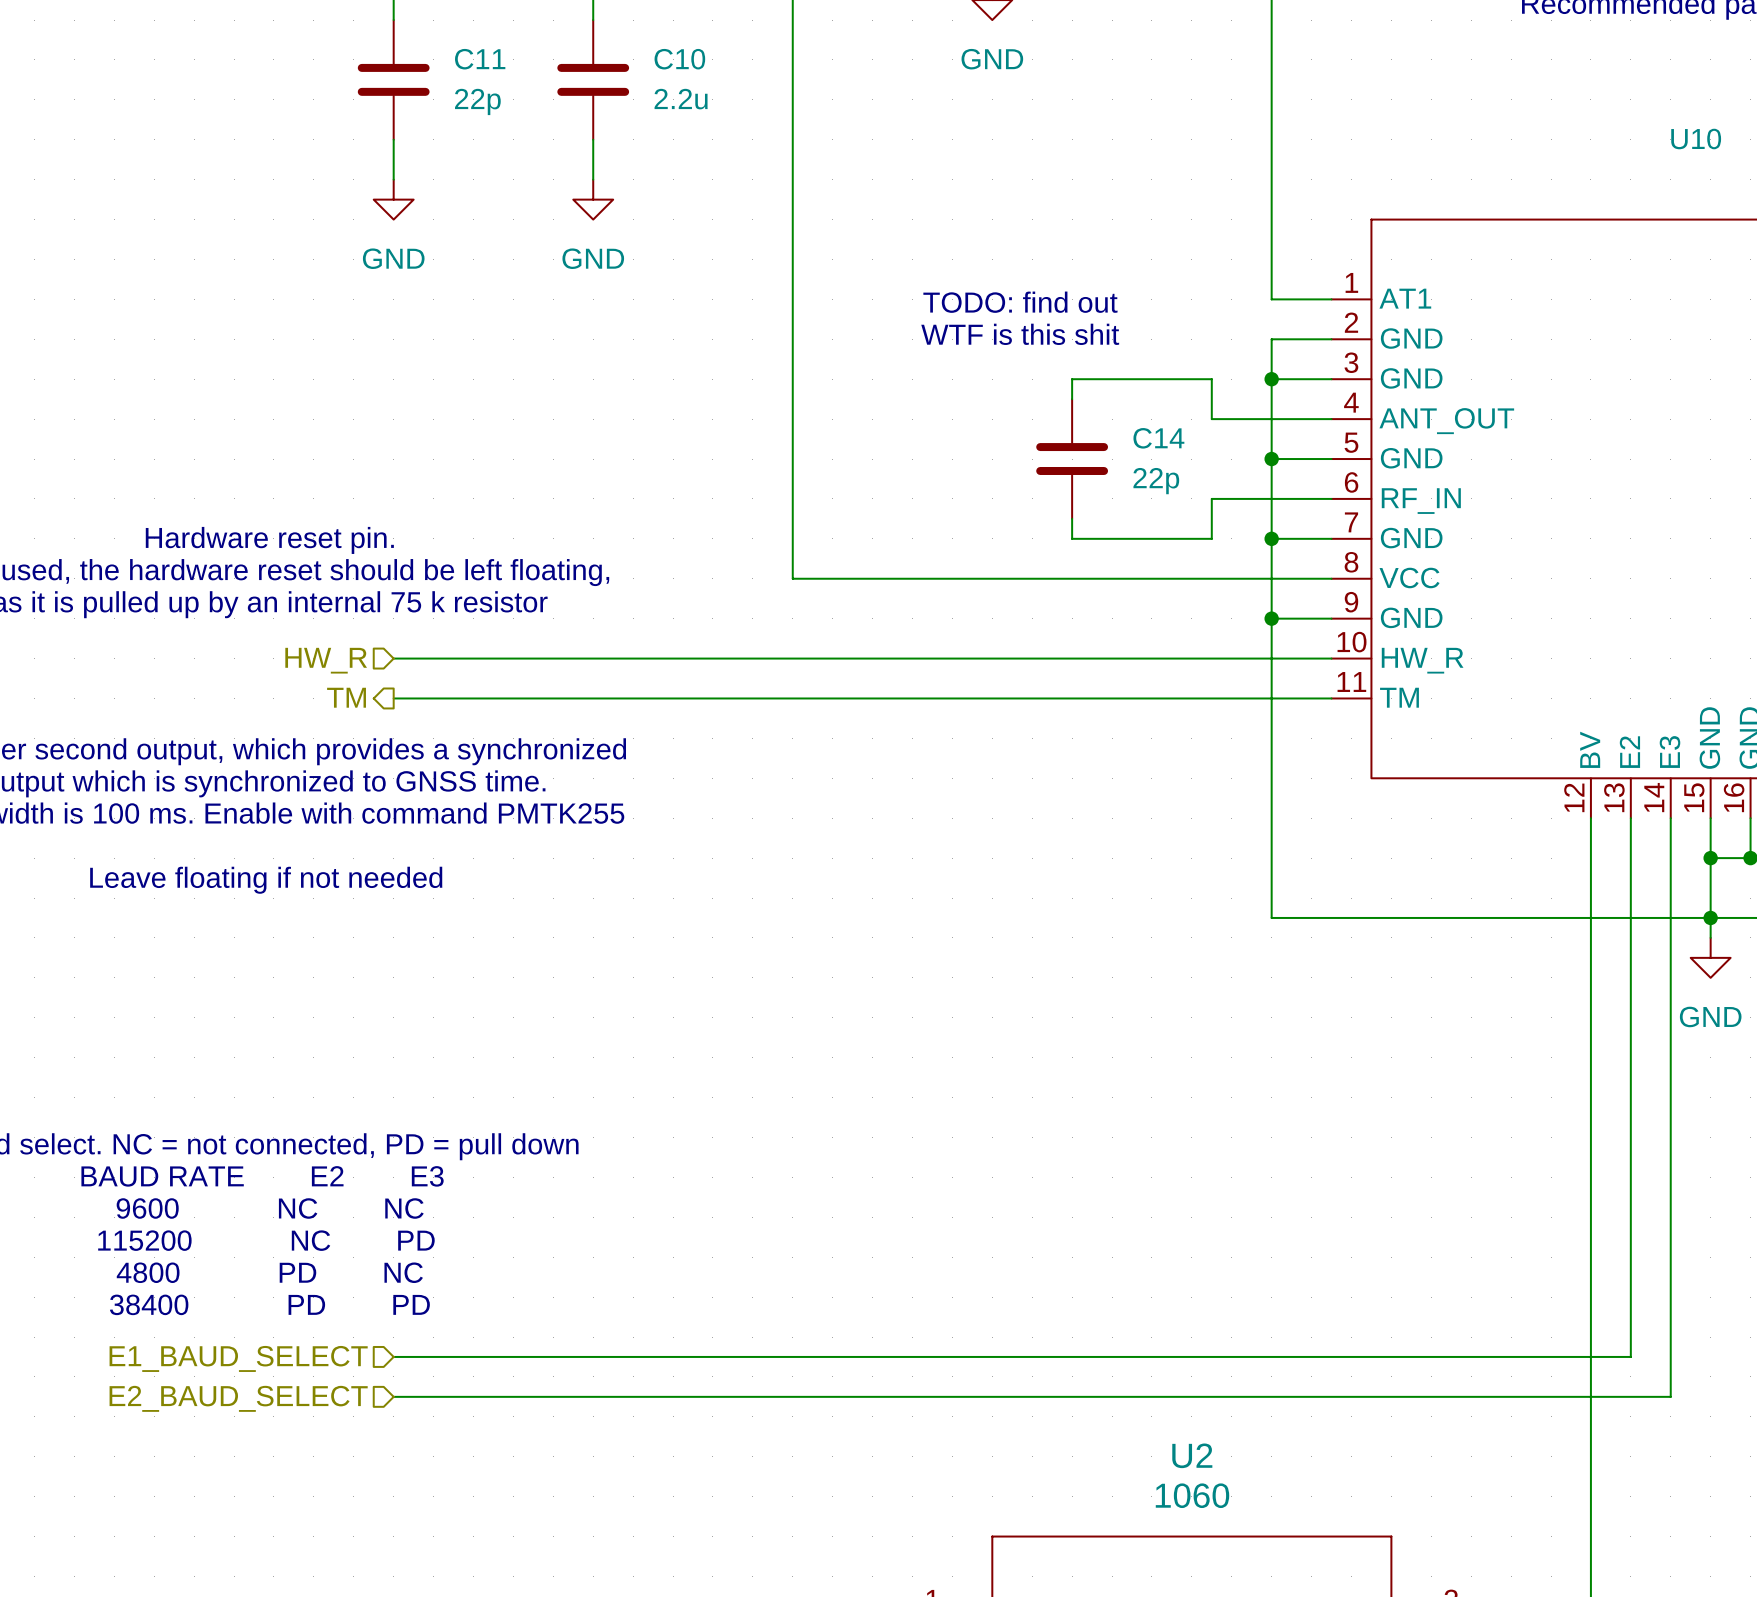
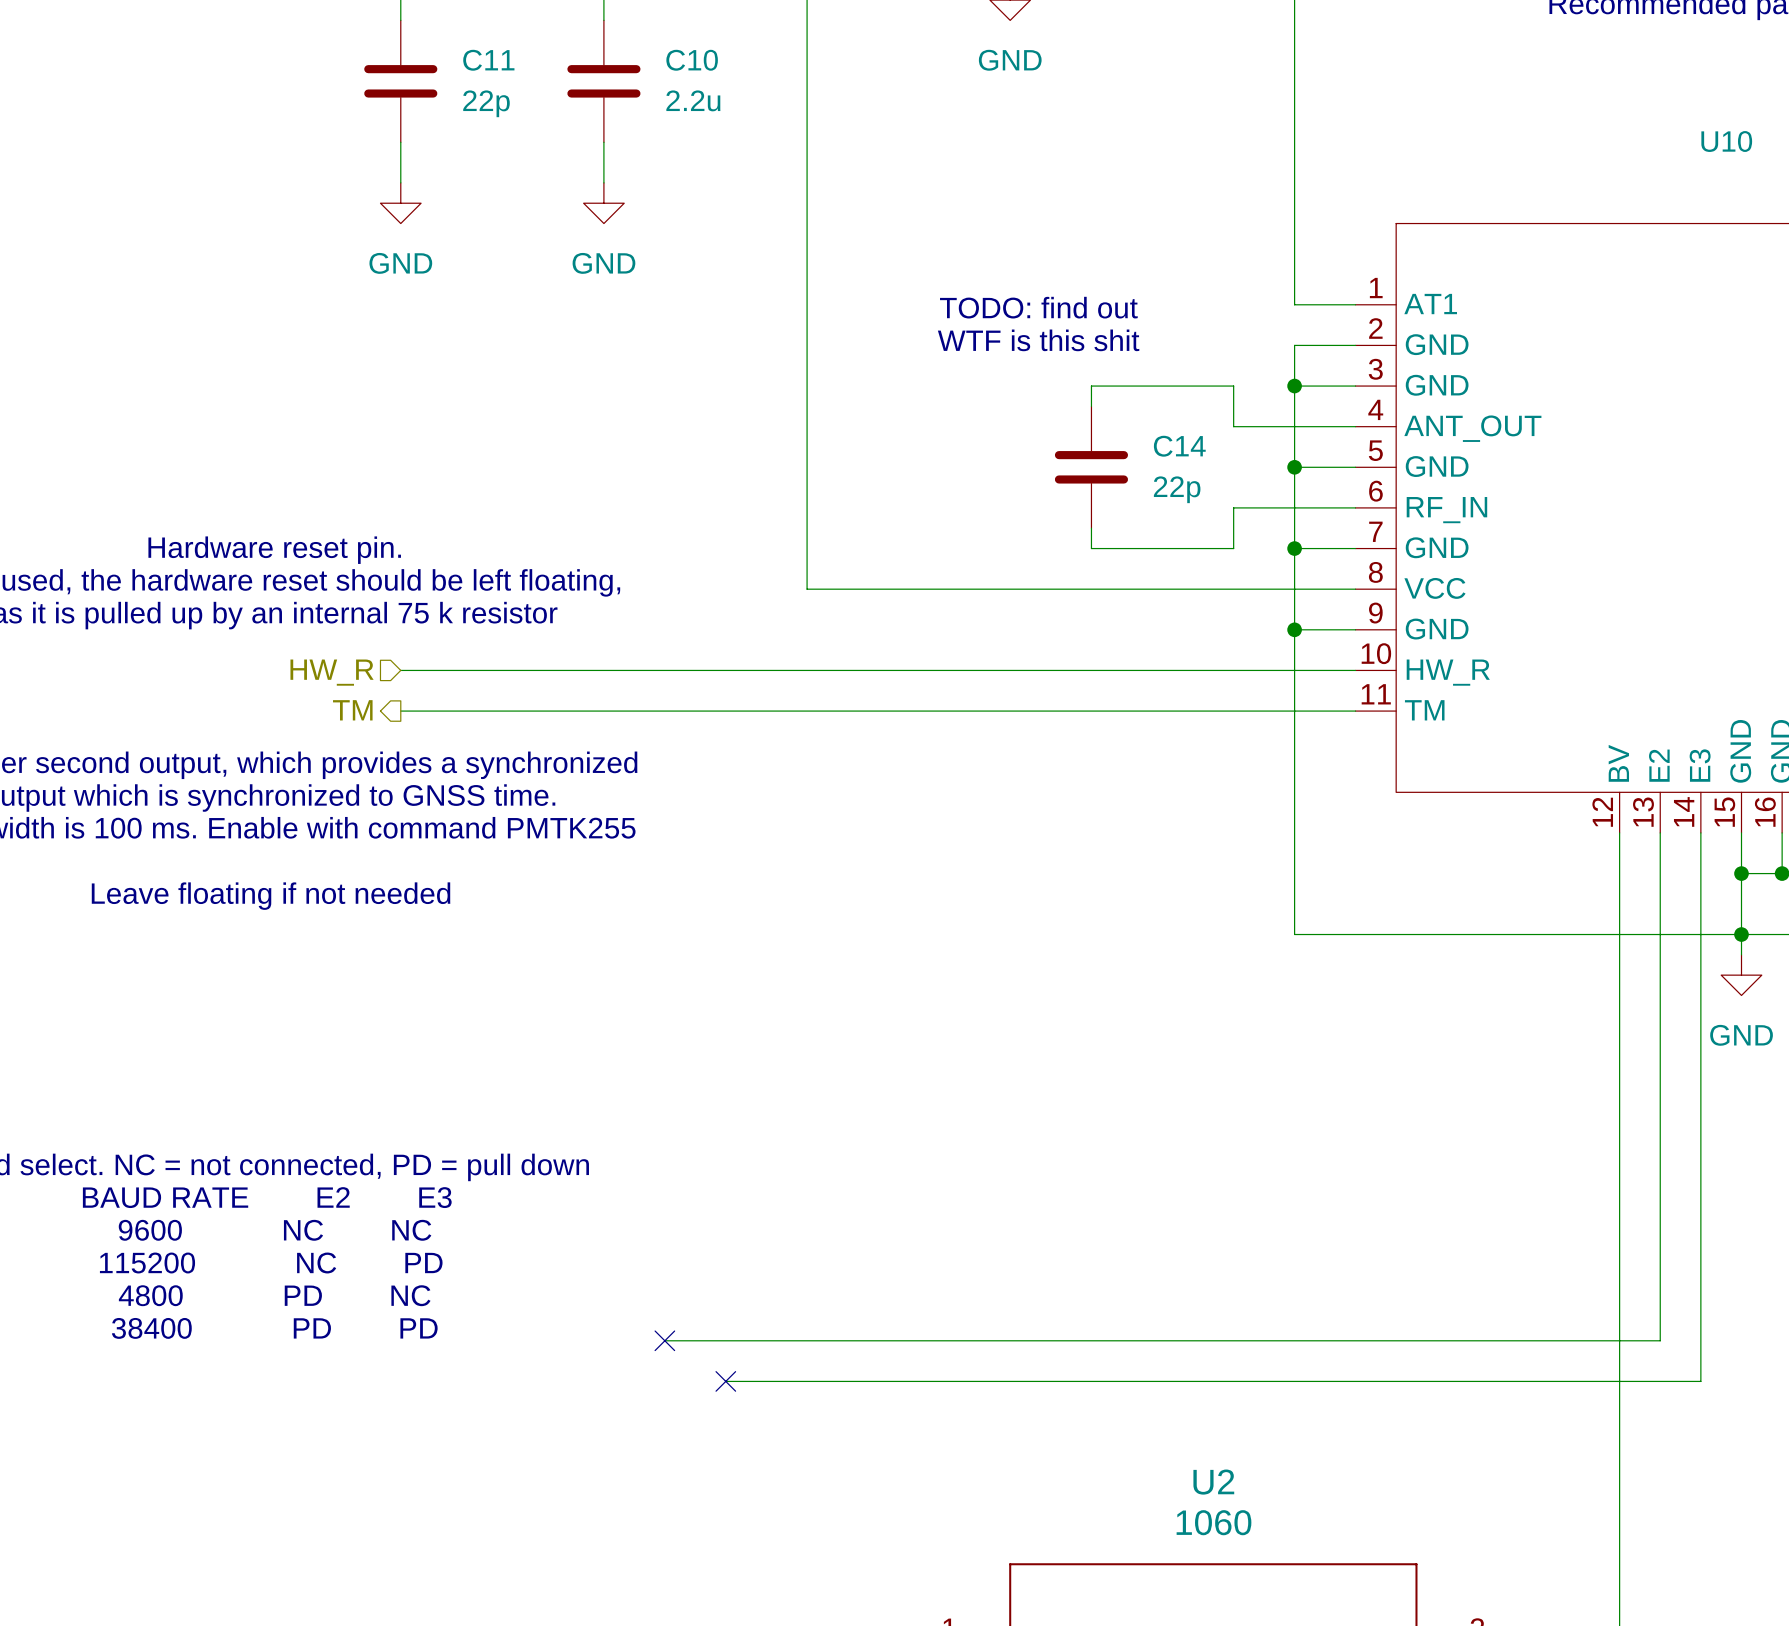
wire: none -> (664, 1340) (1660, 1340)
no-connect mark: none -> (664, 1340)
wire: (1630, 1317) (1630, 1356) -> (1700, 1381) (1660, 1381)
wire: (393, 1356) (712, 1356) -> none
no-connect mark: none -> (725, 1381)
wire: (1670, 1356) (1670, 1396) (393, 1396) -> none
hierarchical label: E1_BAUD_SELECT (238, 1358) -> none
hierarchical label: E2_BAUD_SELECT (238, 1398) -> none

